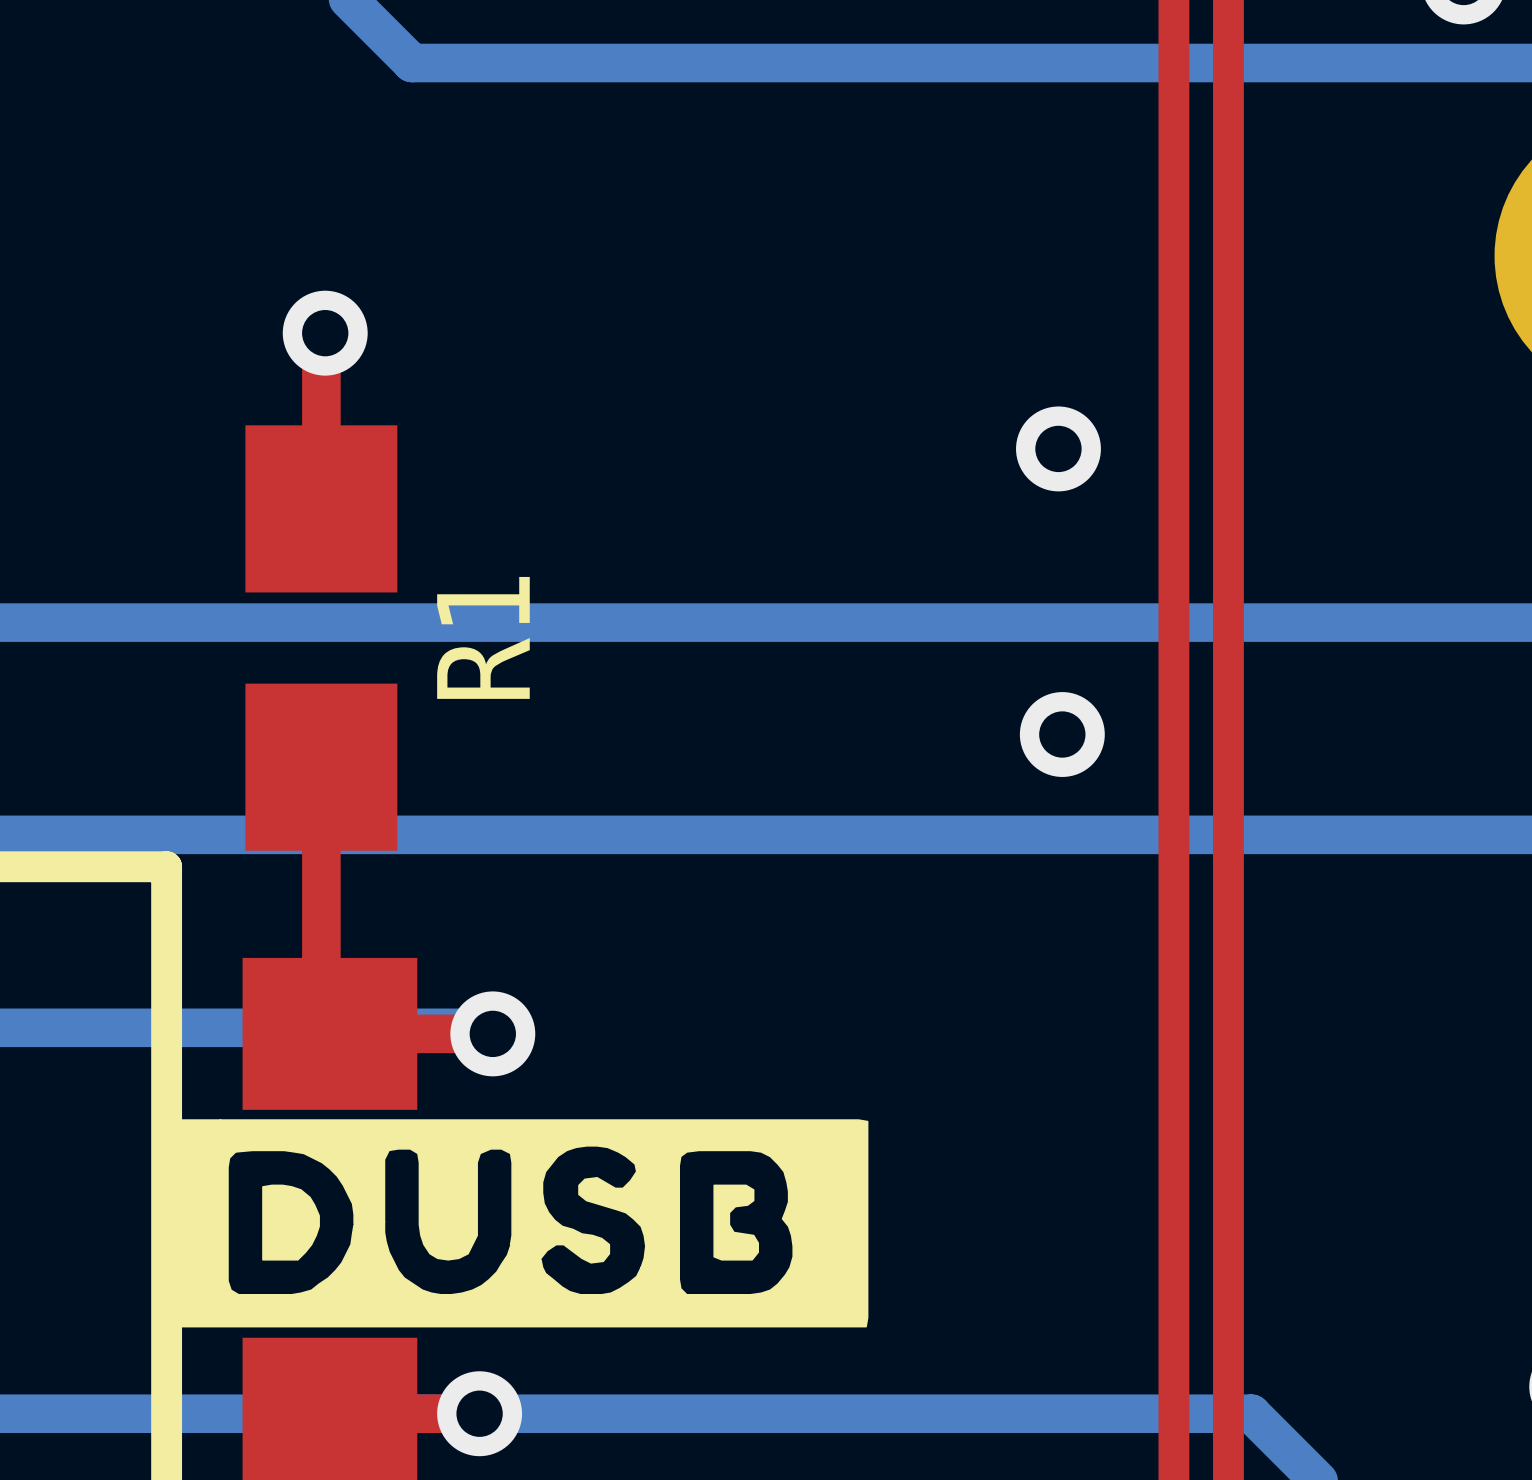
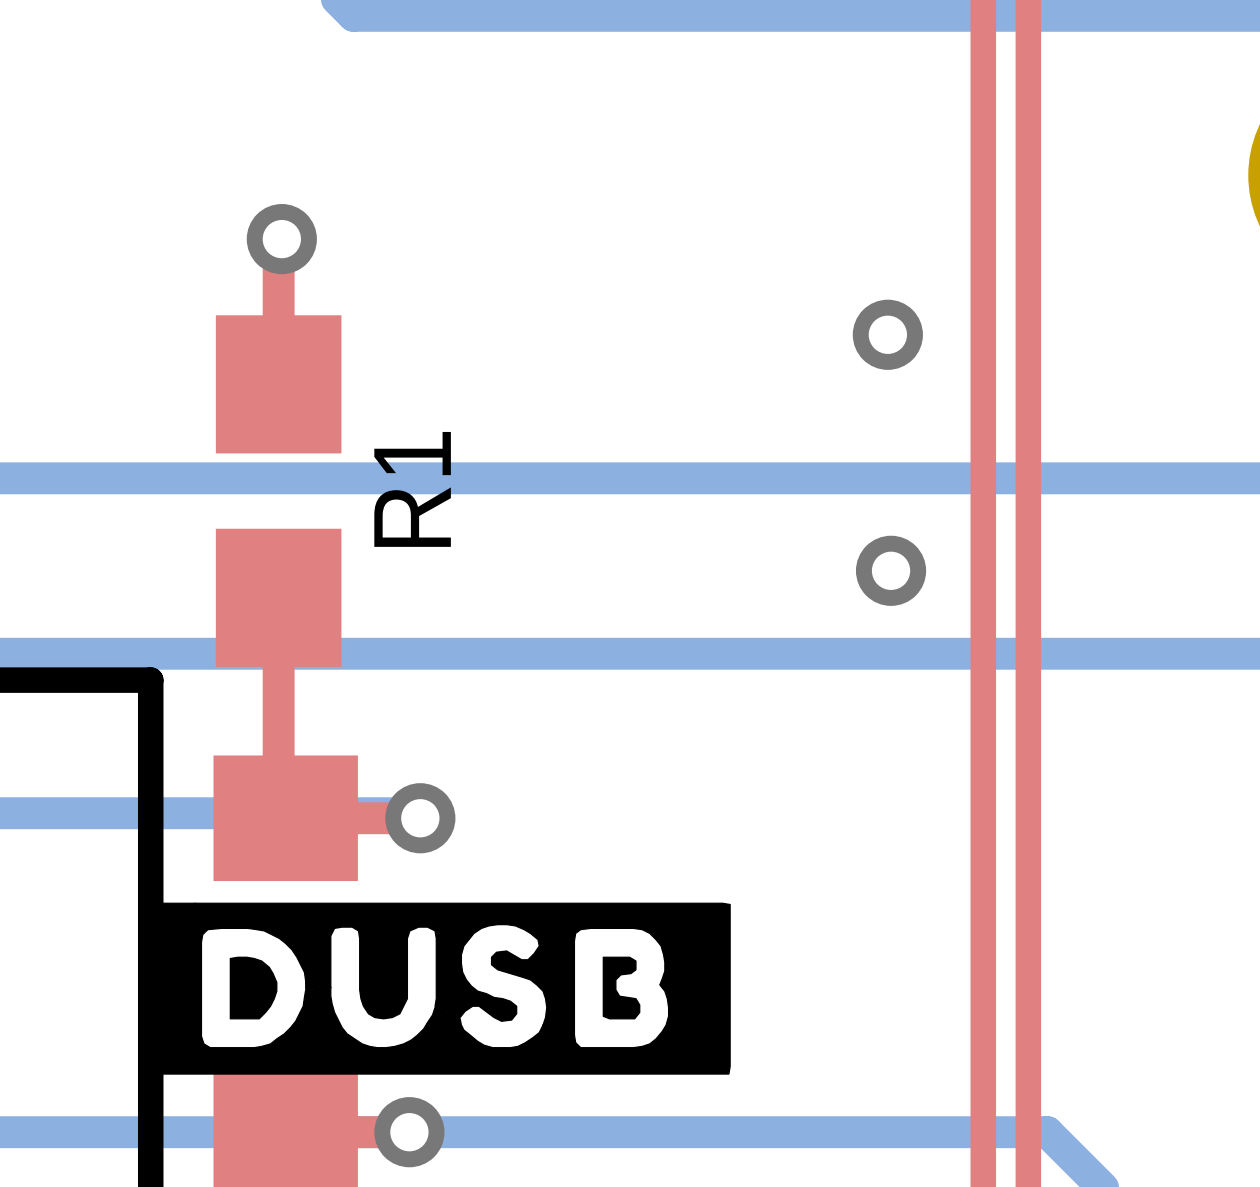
drawing position: (518, 1223) -> (441, 988)

